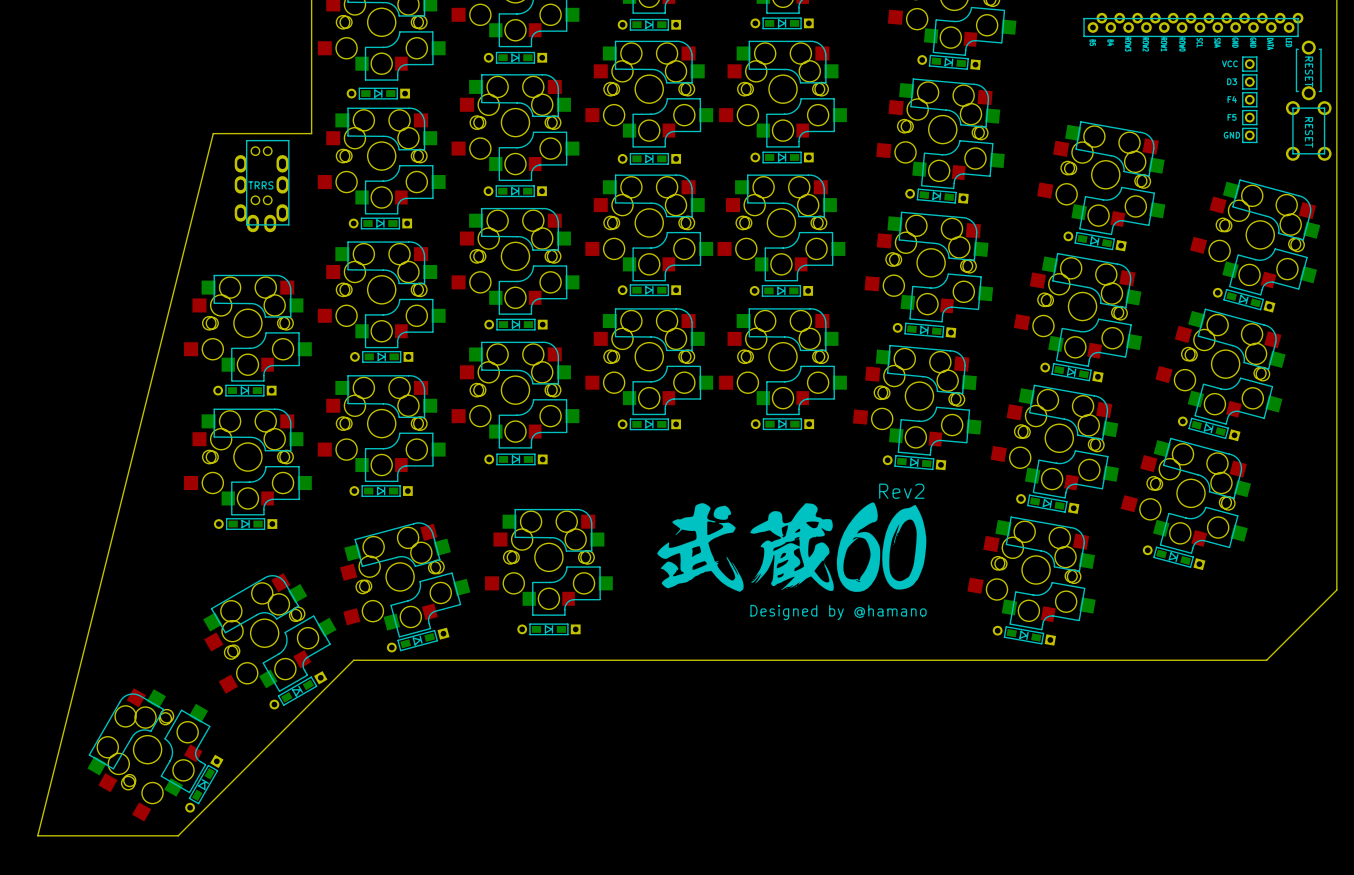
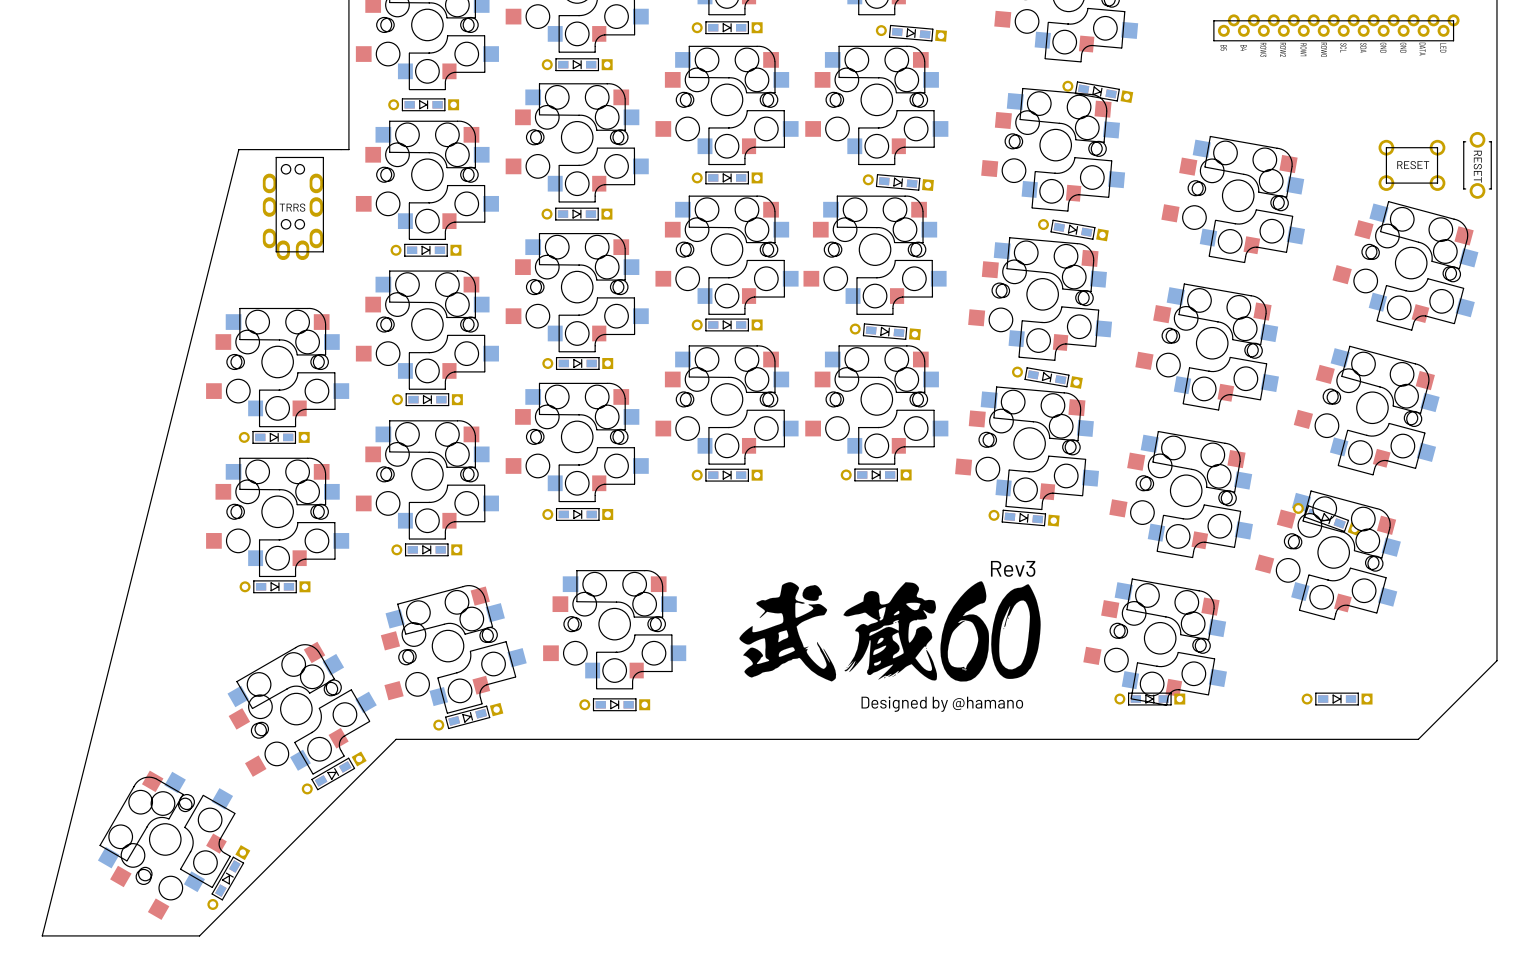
part: (782, 23) -> none
part: none -> (911, 33)
part: (949, 62) -> none
part: (1249, 64) -> none
part position: (1308, 70) -> (1477, 165)
part: (1249, 81) -> none
part: none -> (1097, 91)
part: (1249, 99) -> none
part: (1249, 117) -> none
part rotation: 0° (1308, 130) -> 90° counterclockwise (1411, 165)
part position: (1308, 130) -> (1411, 165)
part: (1249, 135) -> none
part: (782, 157) -> none
part: none -> (898, 182)
part: (936, 196) -> none
part: none -> (1073, 230)
part: (1095, 241) -> none
part: (781, 290) -> none
part: none -> (885, 331)
part: (1244, 300) -> none
part: (924, 330) -> none
part: none -> (1047, 377)
part: (1071, 372) -> none
part: (1209, 428) -> none
part: none -> (1327, 519)
text: Rev2 (901, 491) -> Rev3 (1013, 568)
part: (1047, 504) -> none
drawing position: (791, 547) -> (890, 631)
part: (1174, 557) -> none
text position: Designed by @hamano (838, 612) -> Designed by @hamano (942, 704)
part: none -> (1149, 699)
part: none -> (1337, 699)
part: (1024, 635) -> none

